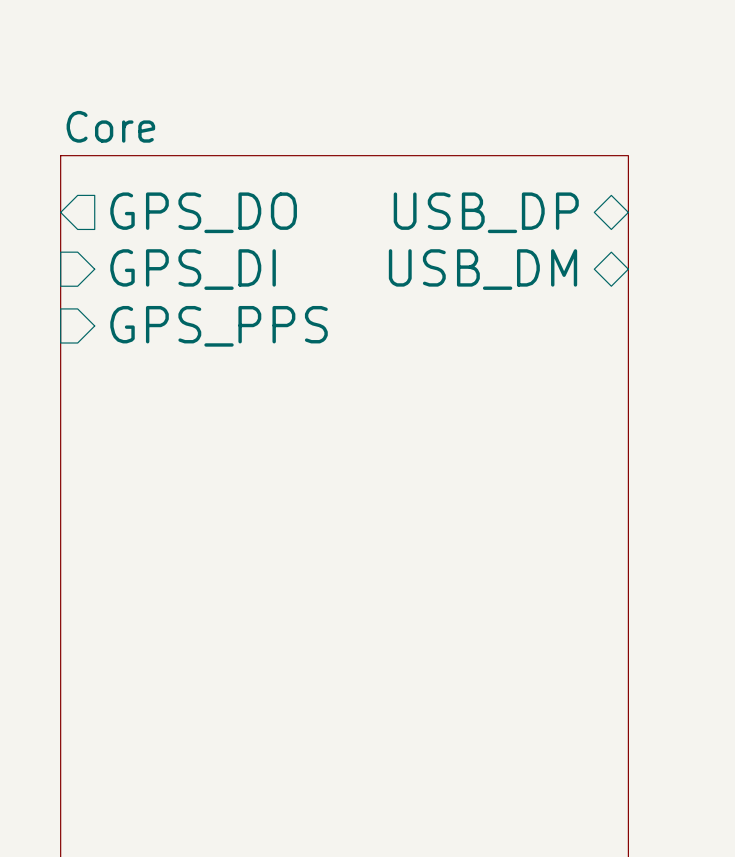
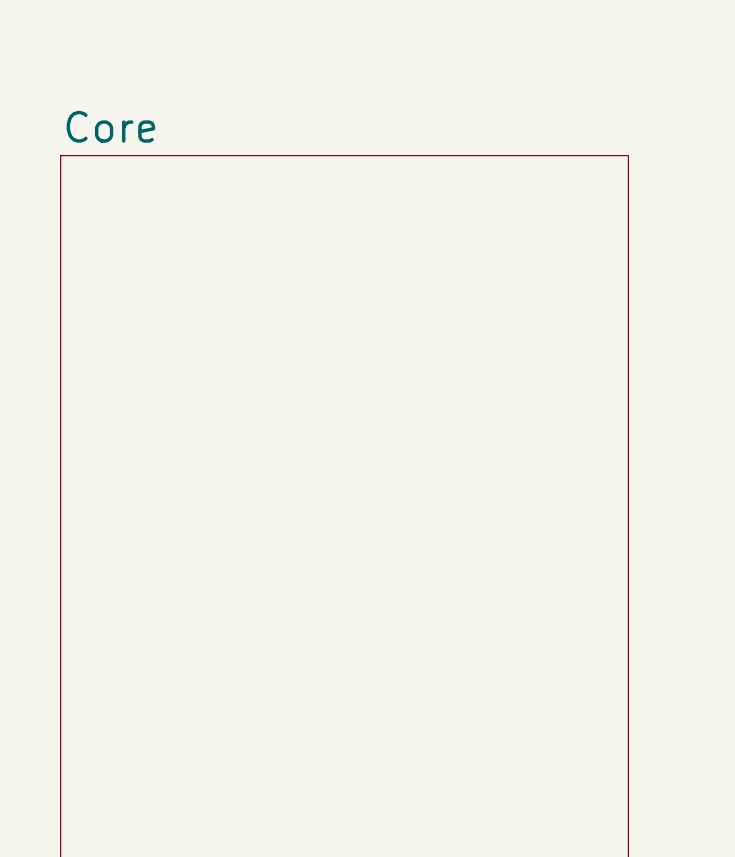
sheet pin: GPS_DO (203, 212) -> none
sheet pin: USB_DP (486, 212) -> none
sheet pin: GPS_DI (193, 269) -> none
sheet pin: USB_DM (483, 269) -> none
sheet pin: GPS_PPS (219, 326) -> none

